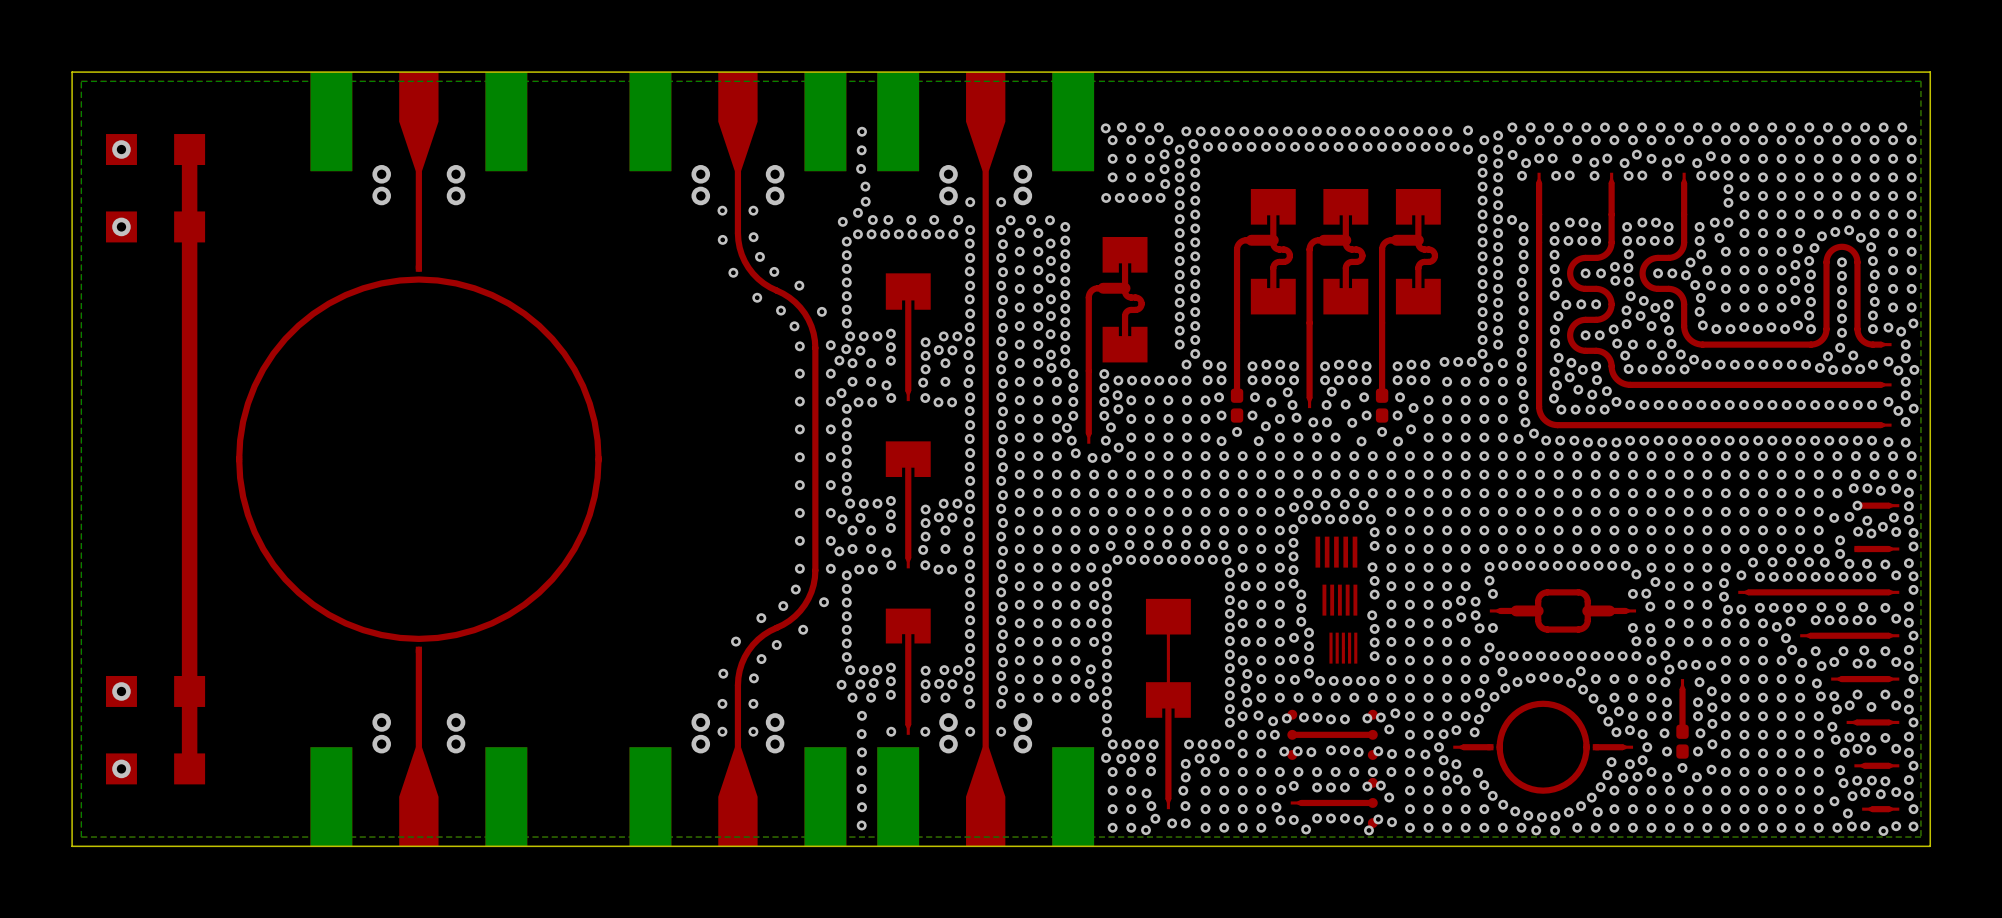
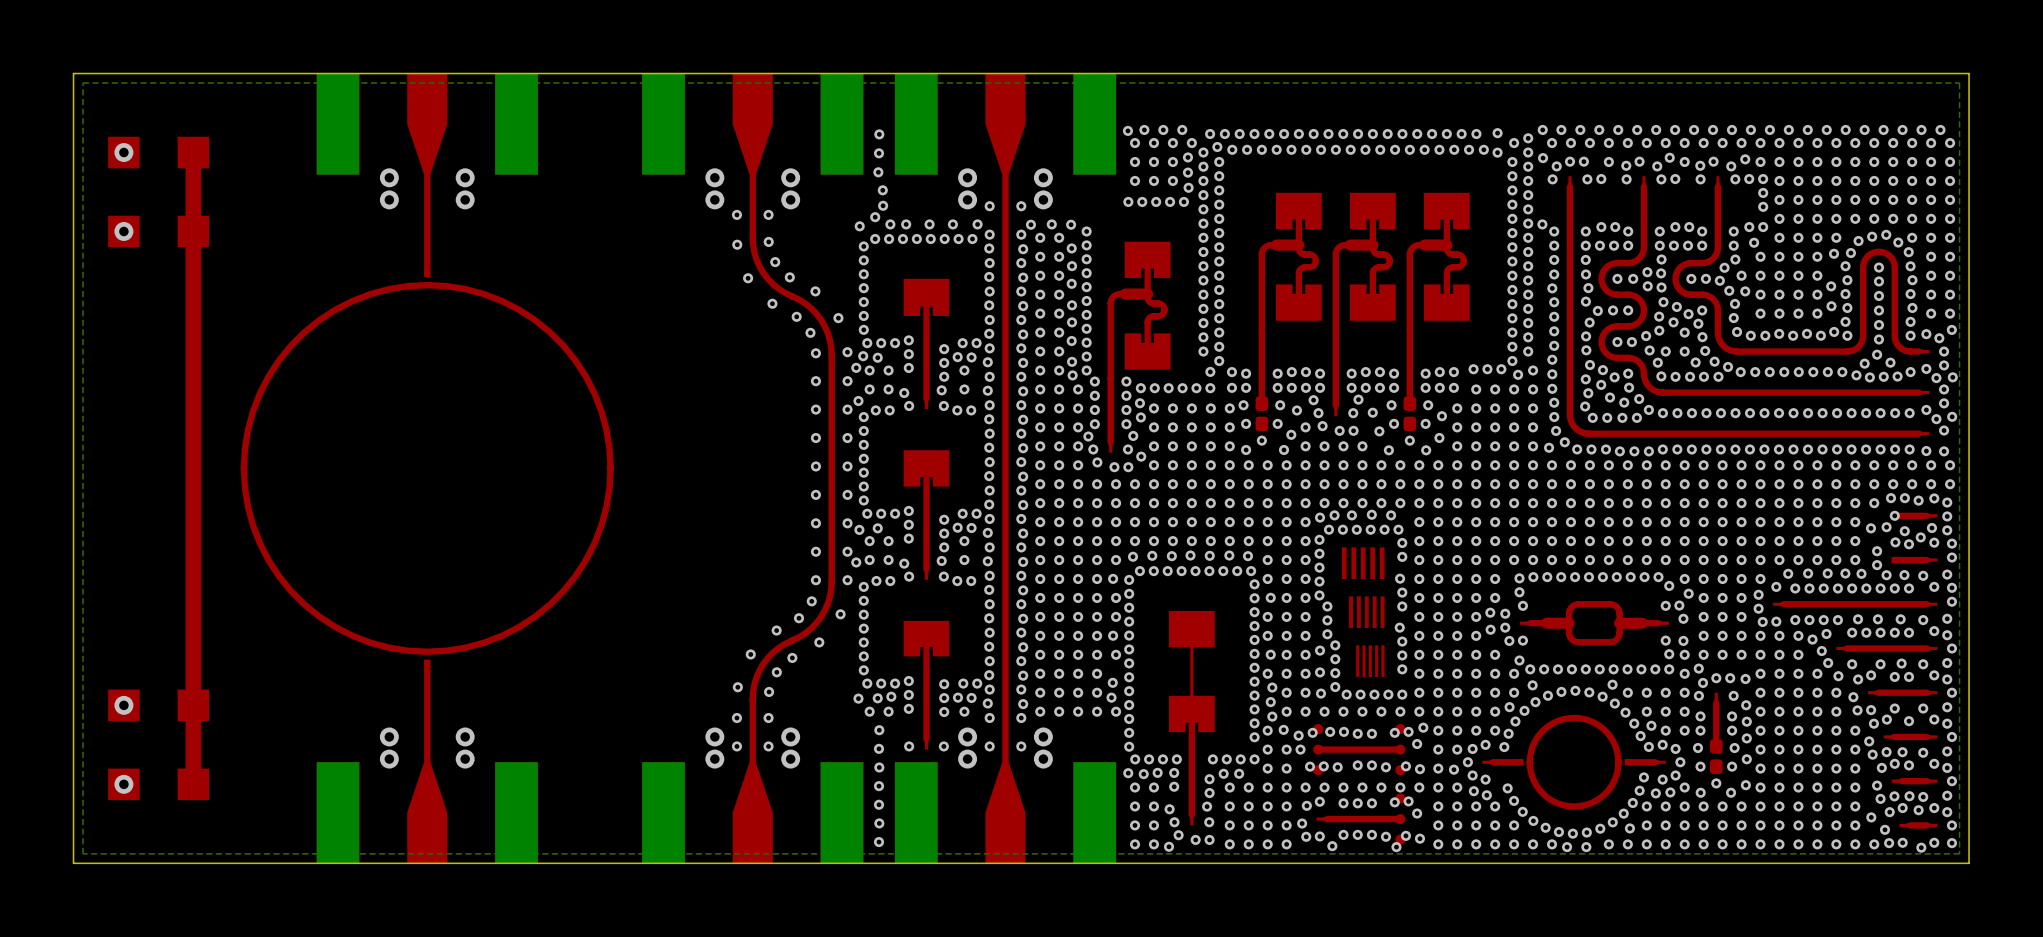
via: (1795, 264) -> none

